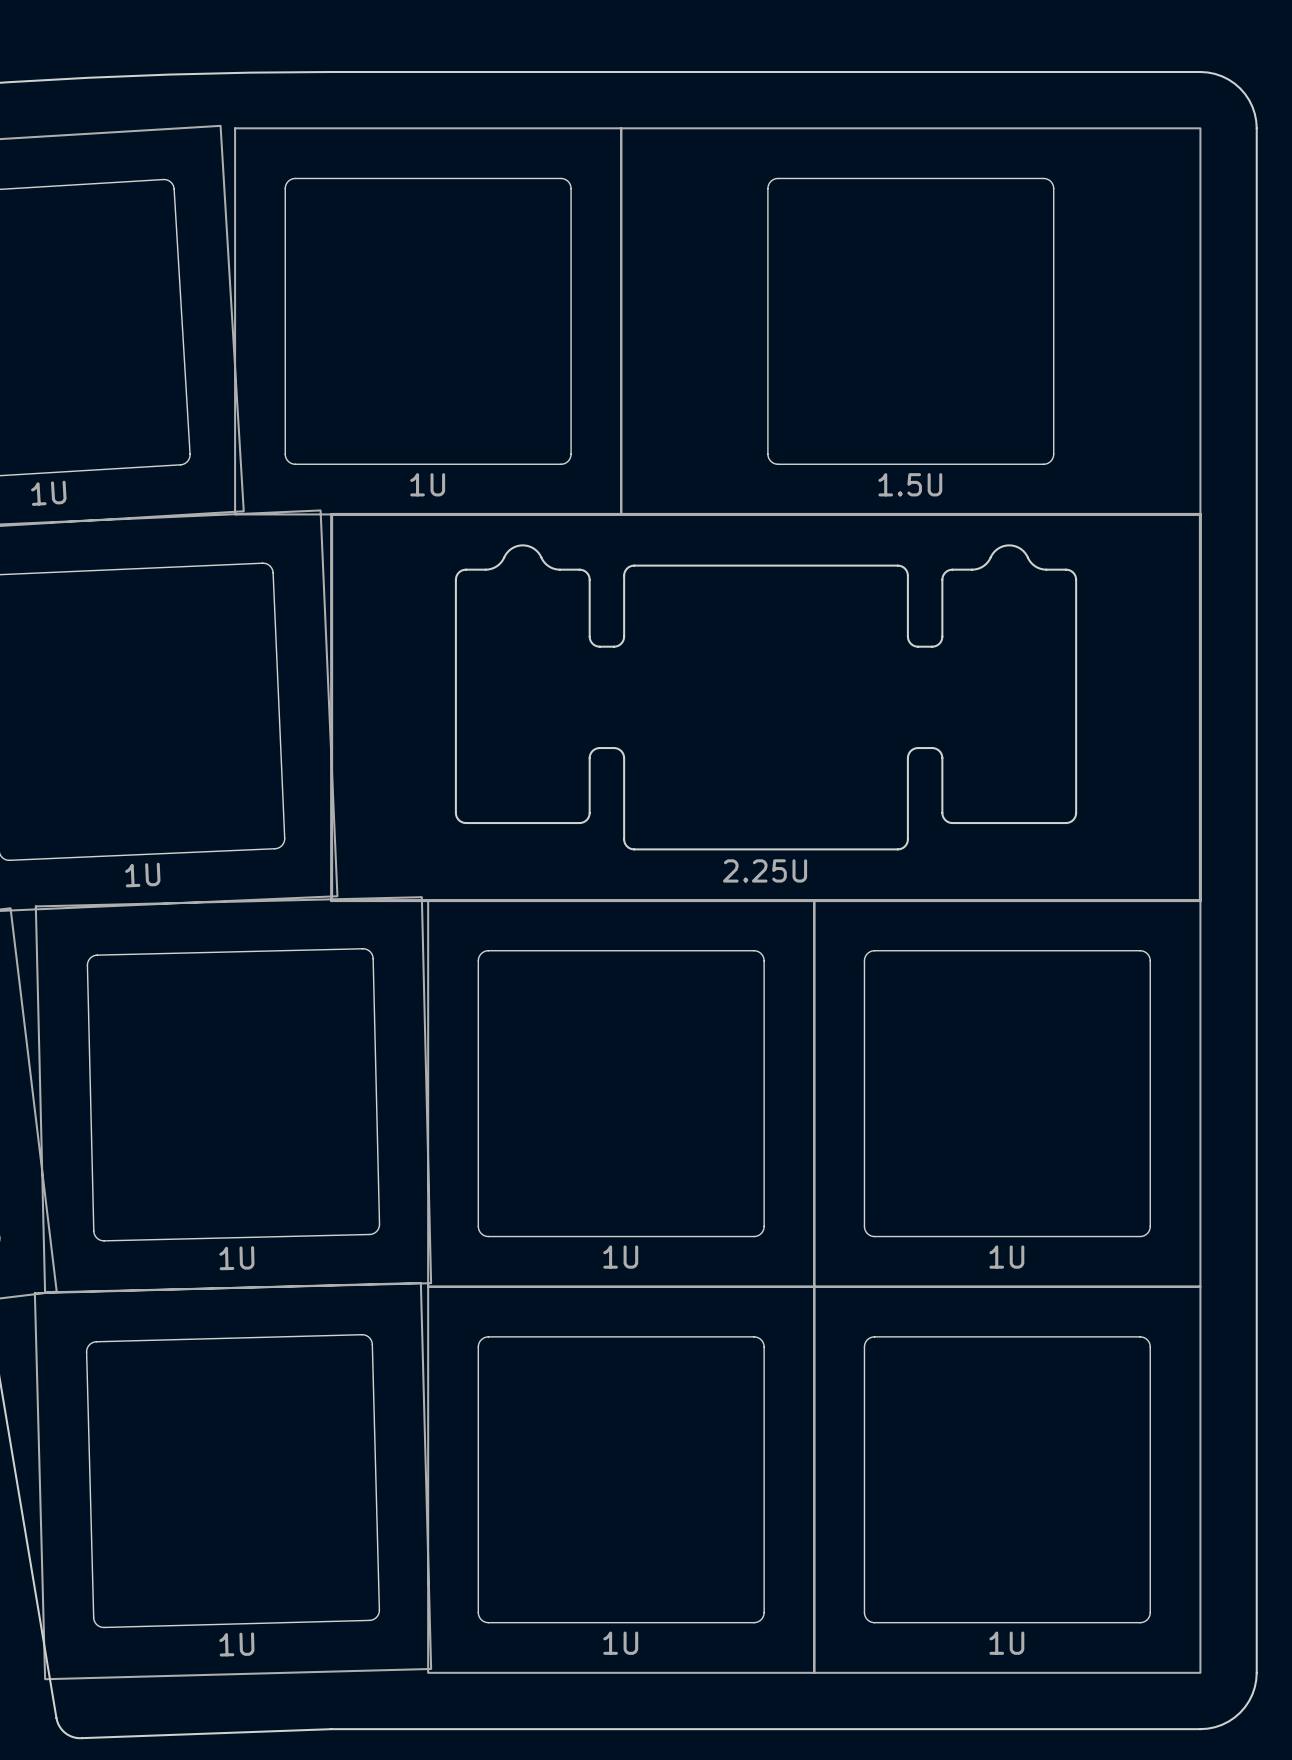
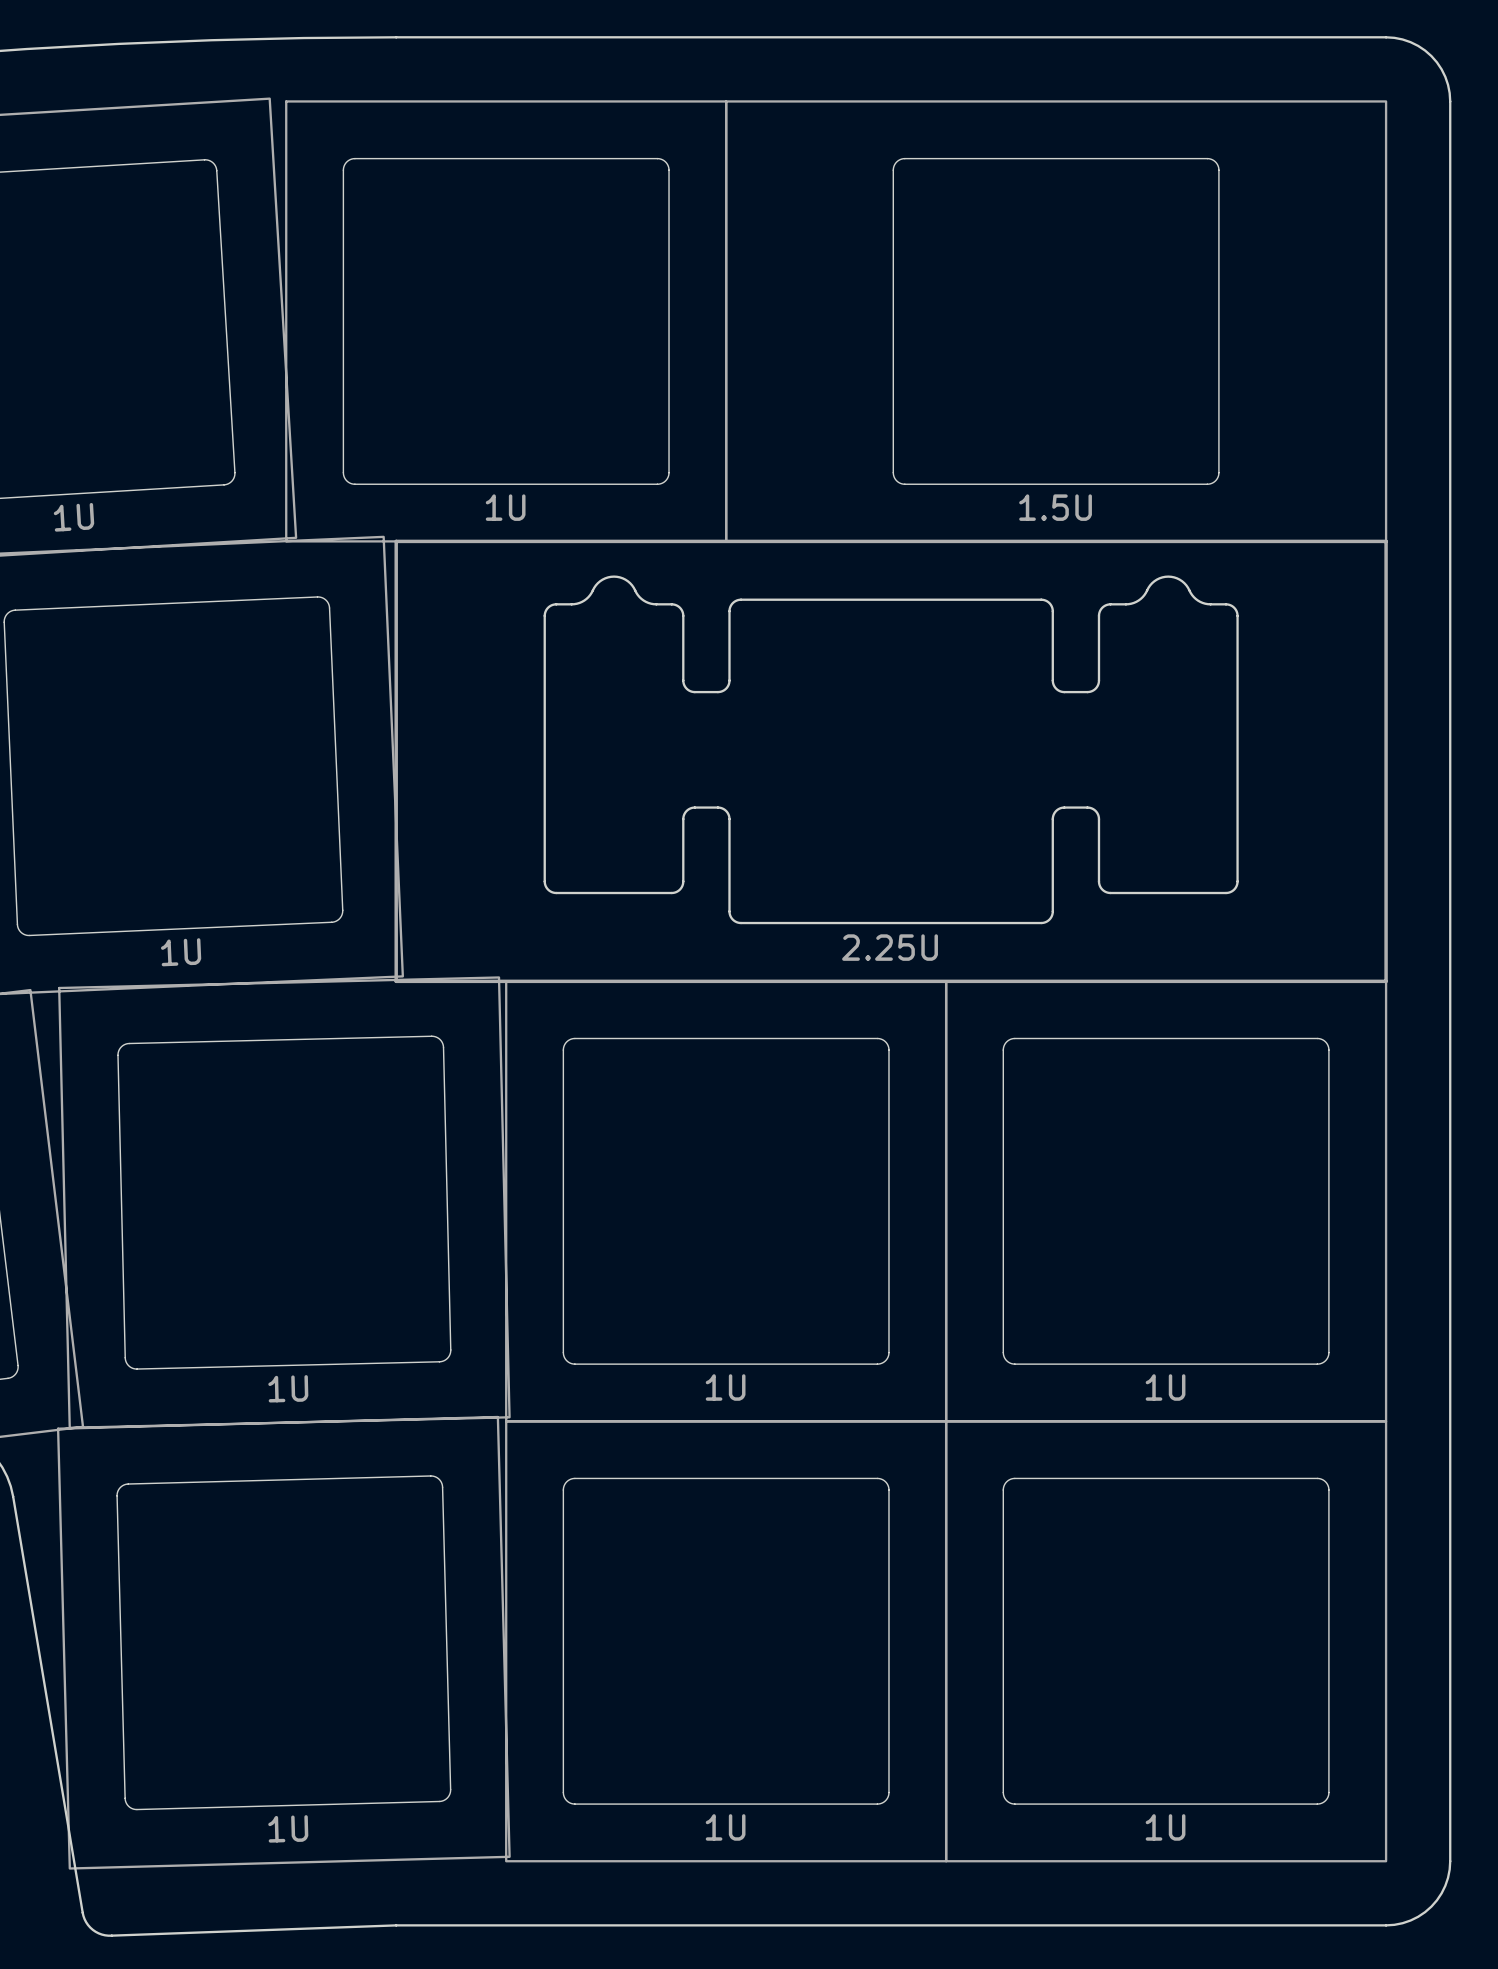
drawing shape: [330, 512, 1202, 903] -> [394, 539, 1388, 984]

